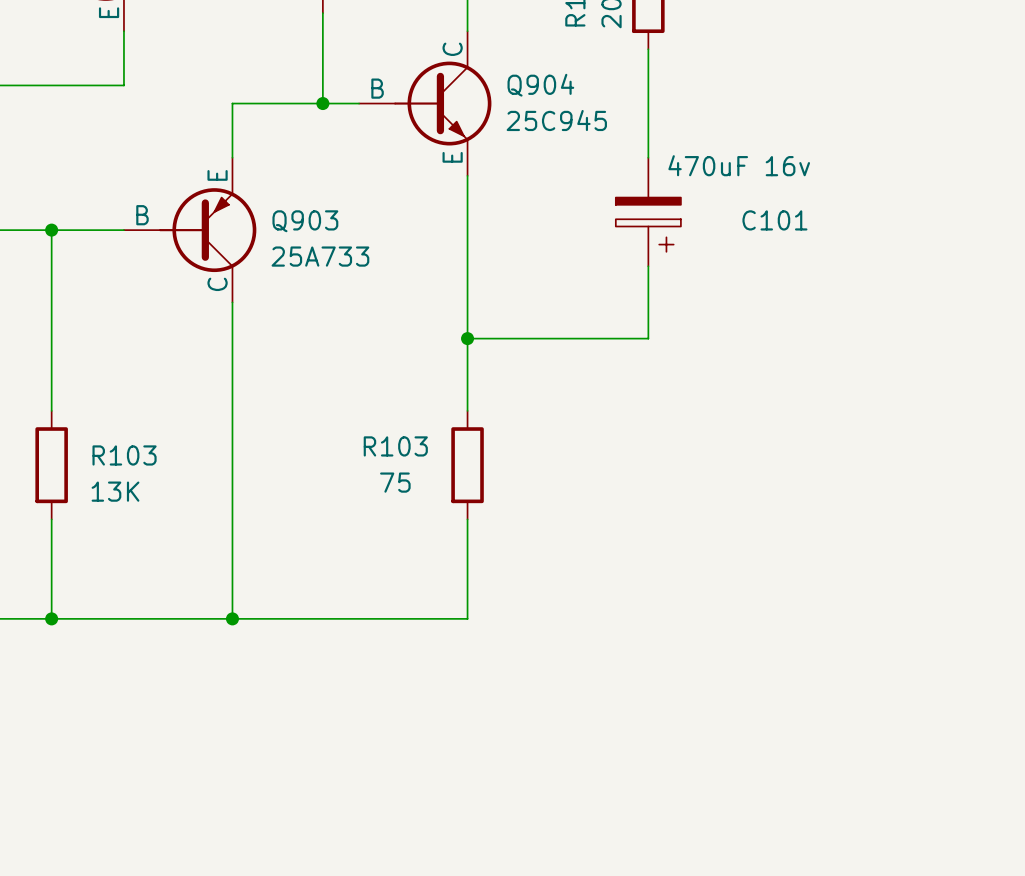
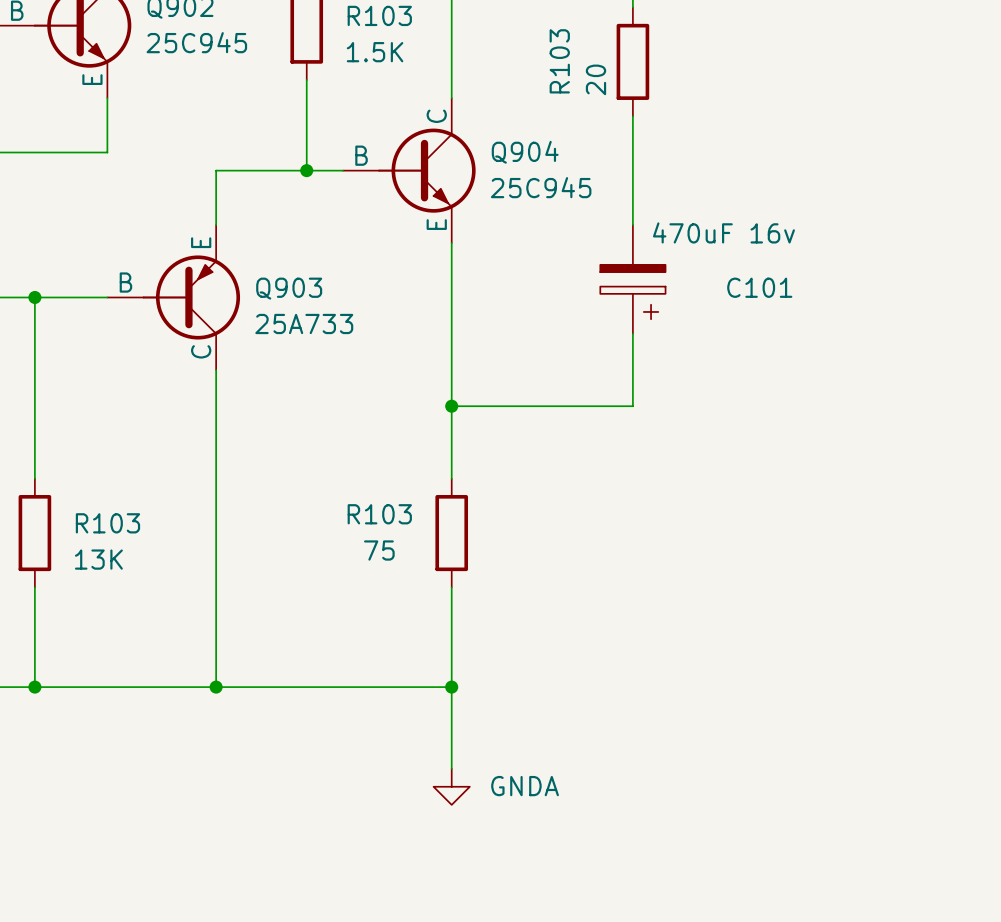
wire: none -> (451, 687) (451, 768)
junction: none -> (451, 687)
power symbol: none -> GNDA (451, 786)

